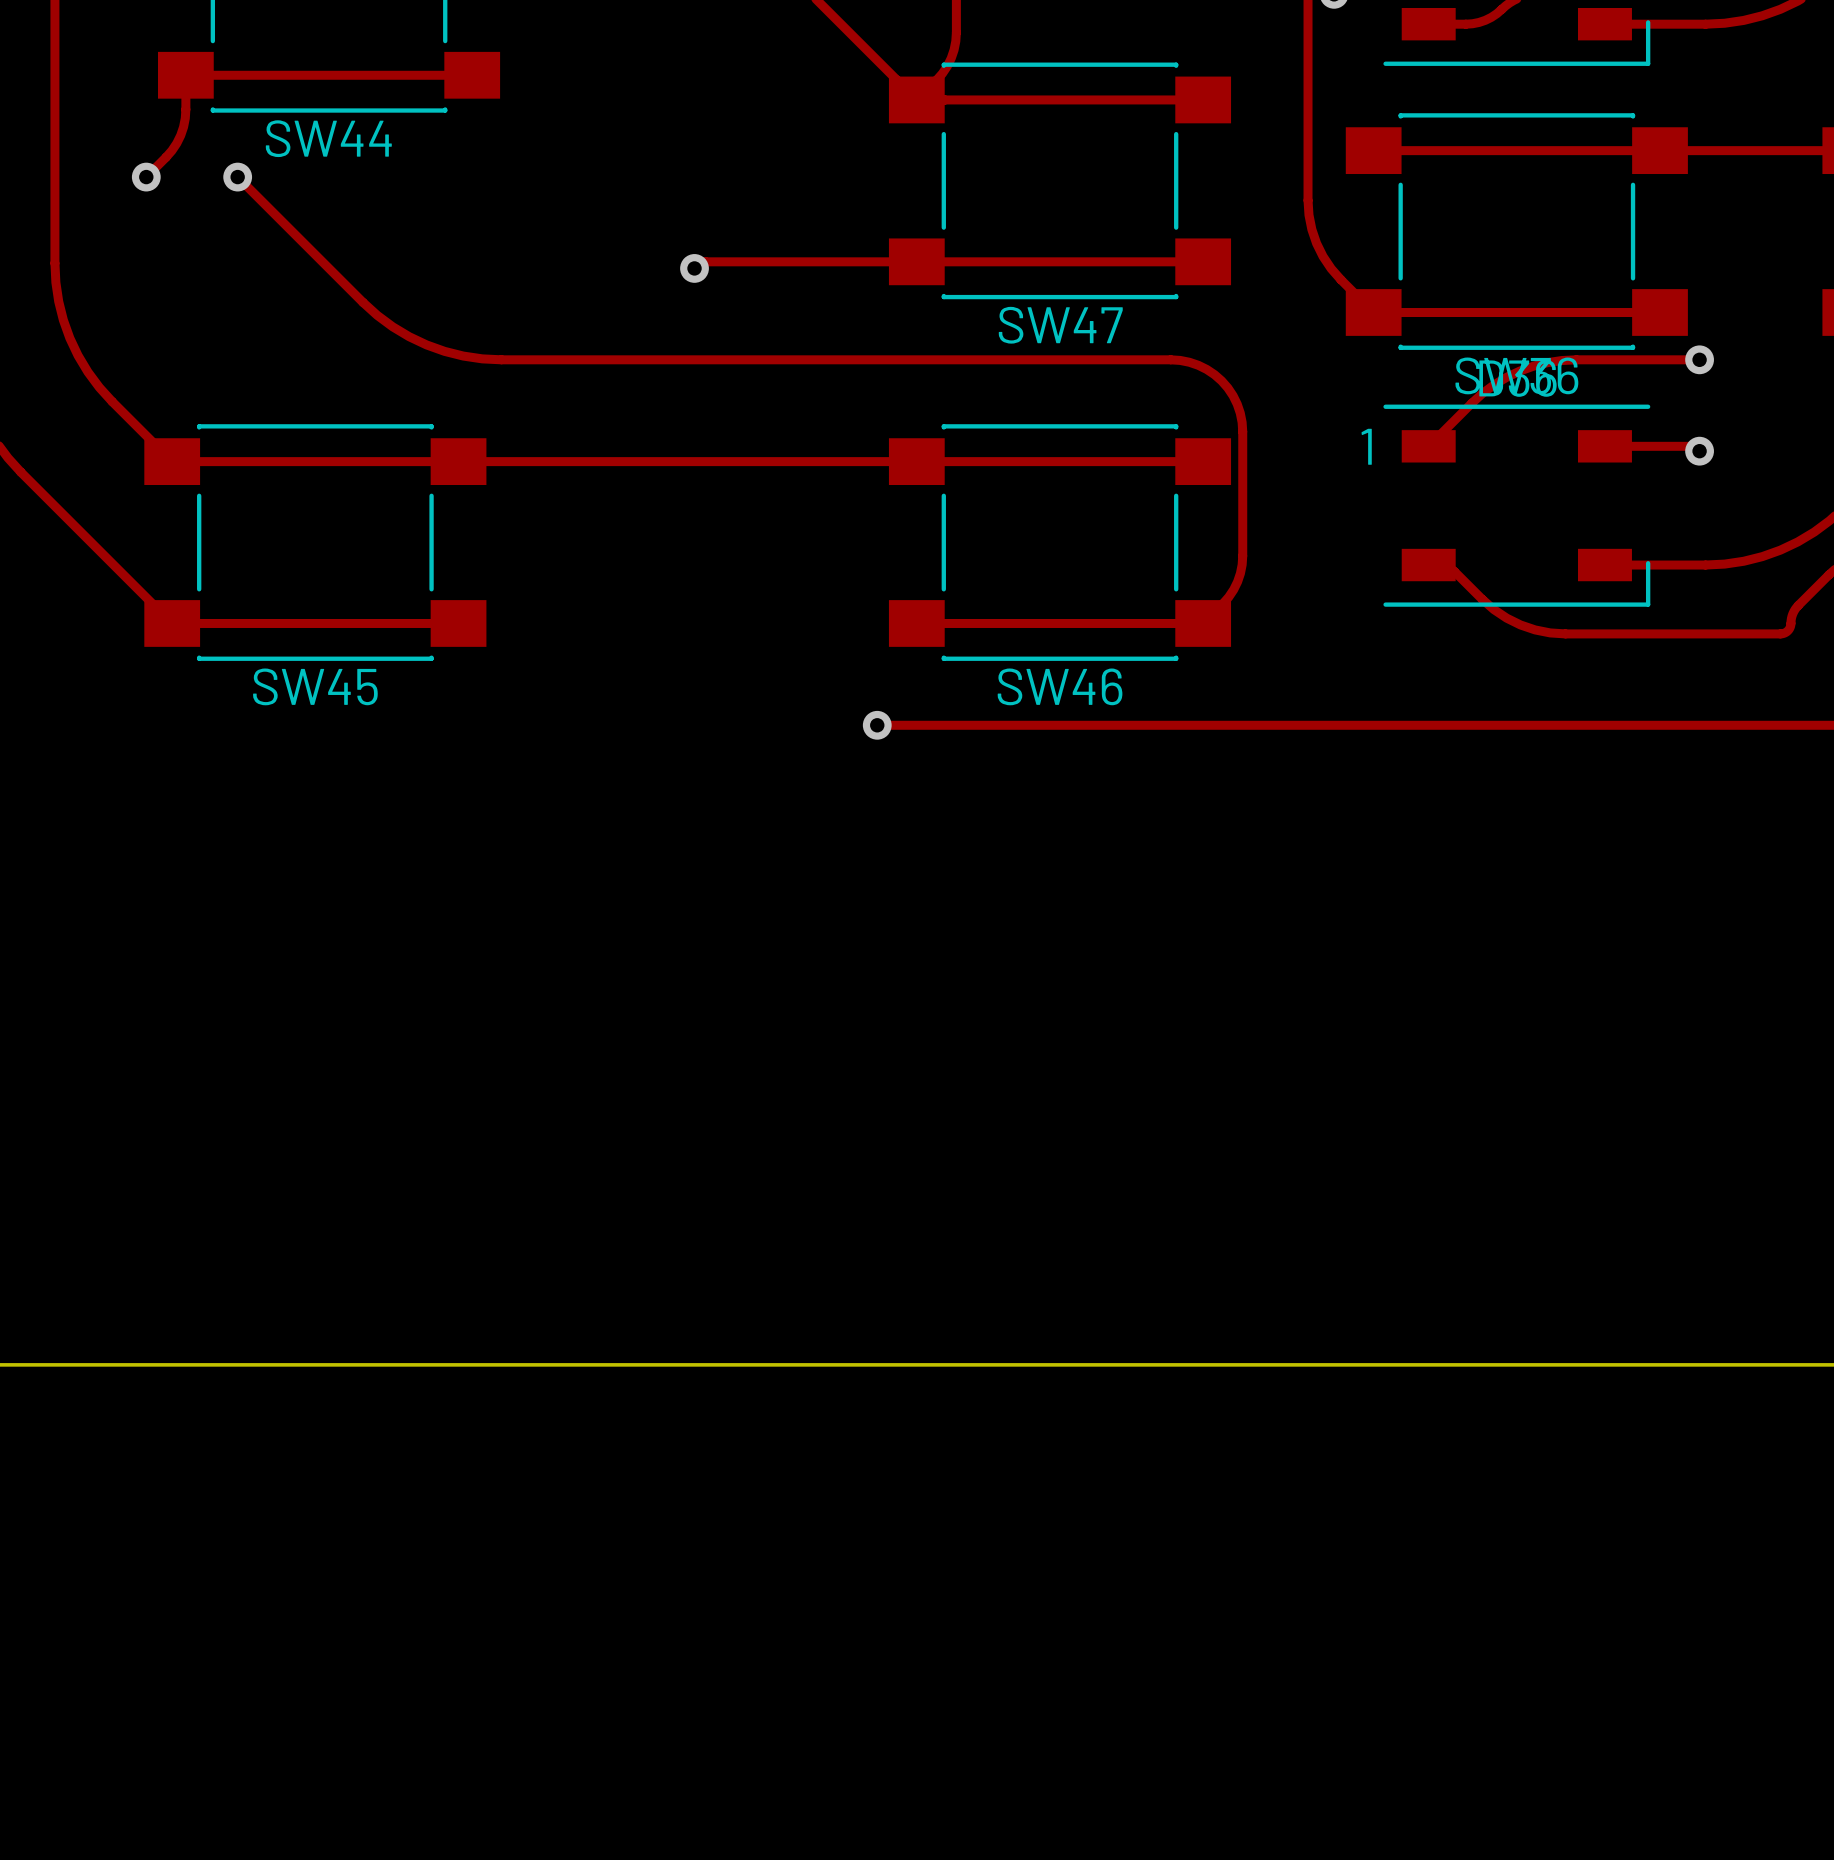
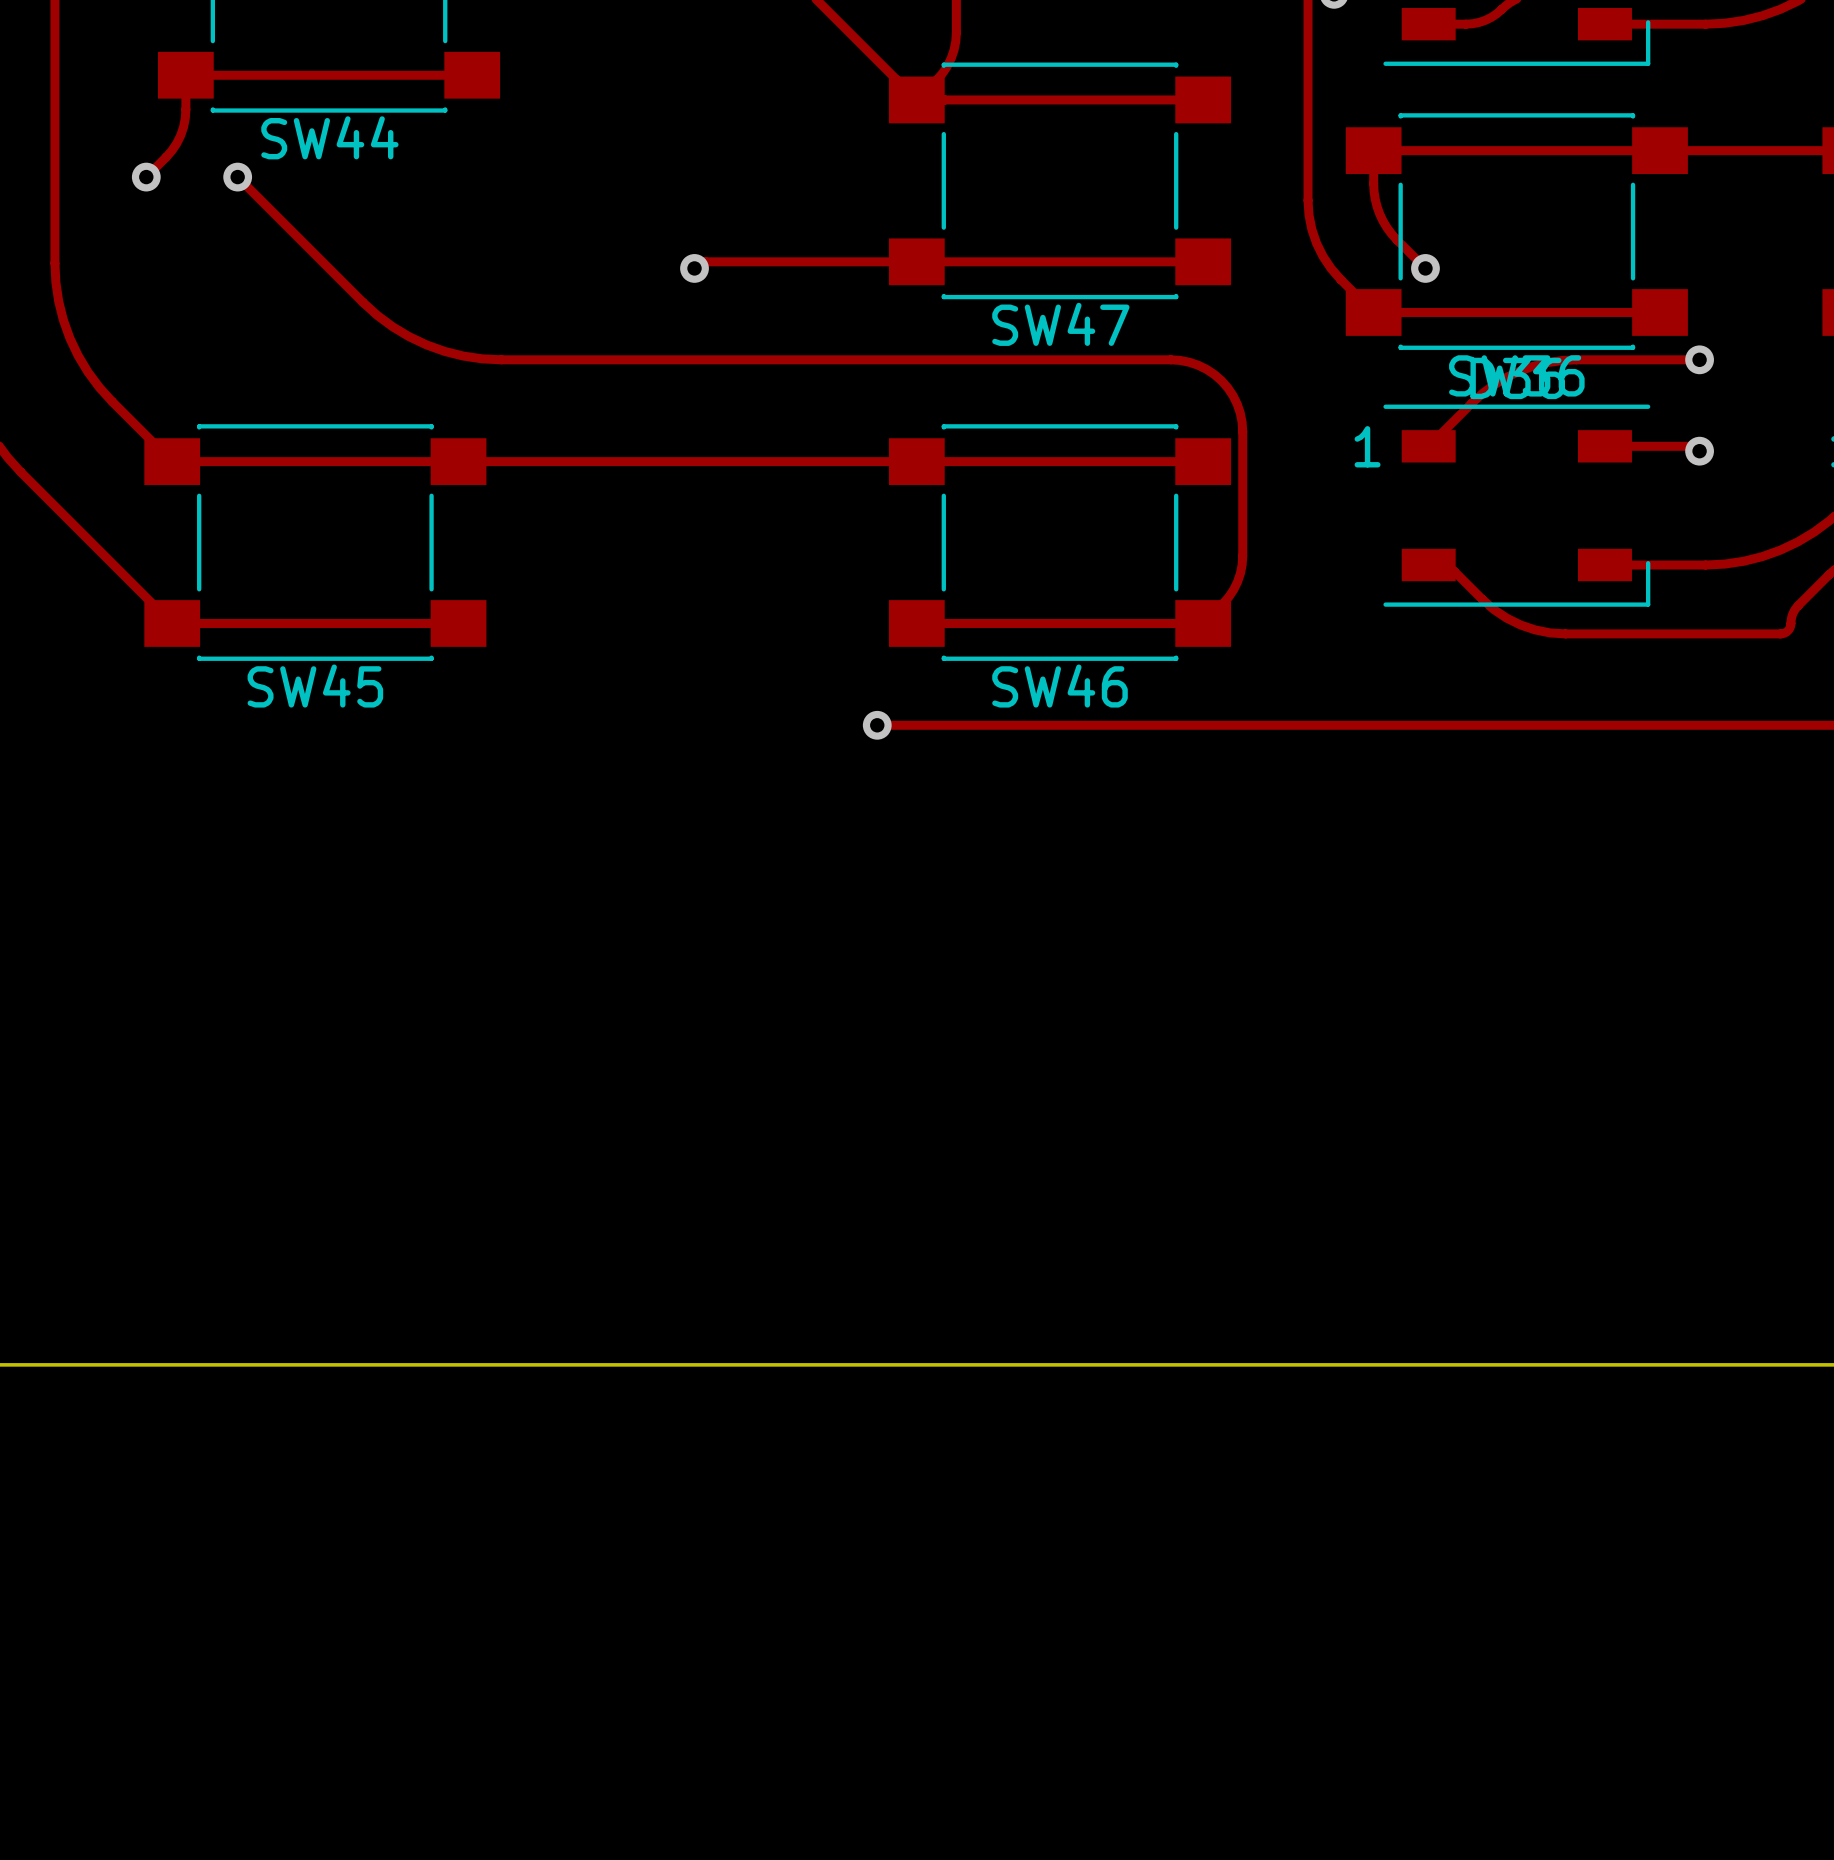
track: none -> (1373, 150) (1374, 191) (1379, 214) (1391, 234) (1425, 268)
via: none -> (1425, 268)

